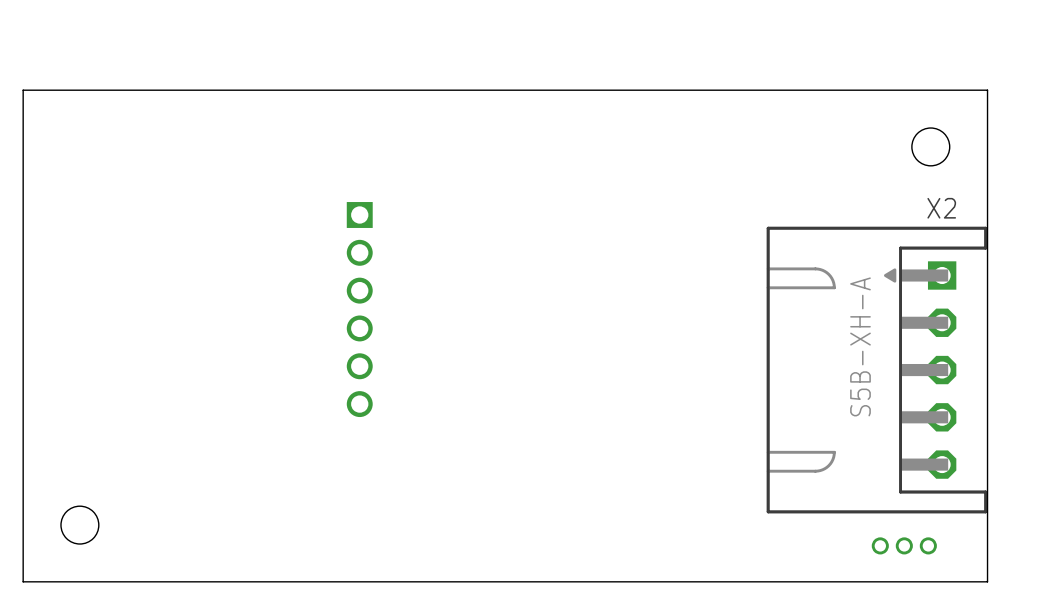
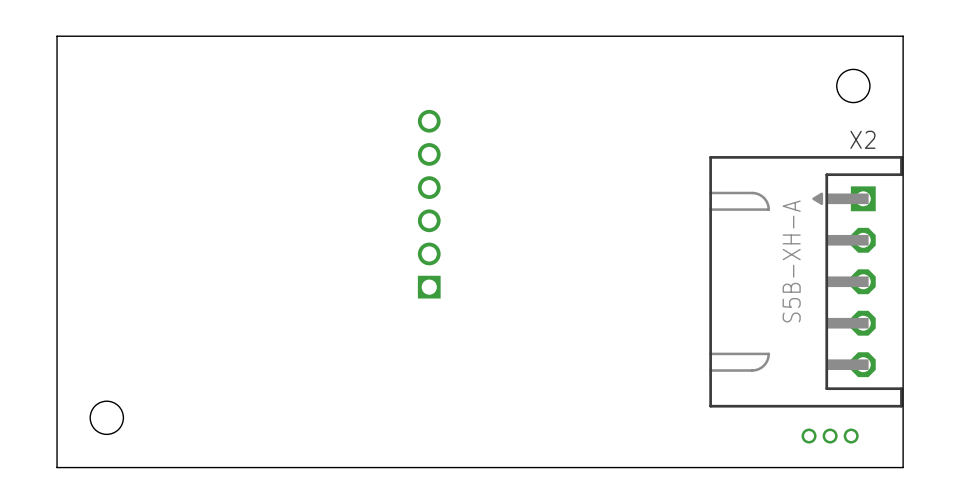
part rotation: 0° (359, 309) -> 180° (429, 204)

